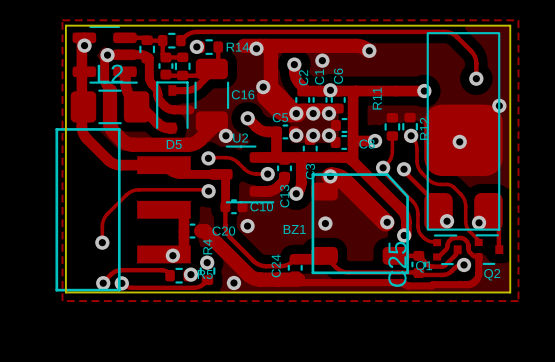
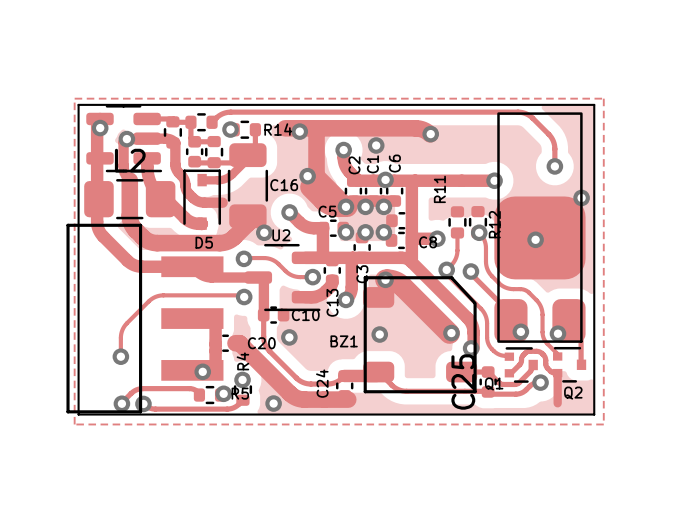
track: (478, 273) (476, 279) (469, 284) (408, 285) (404, 284) -> (557, 392) (557, 403)
track: (298, 279) (301, 282) (400, 282) (404, 284) -> none

